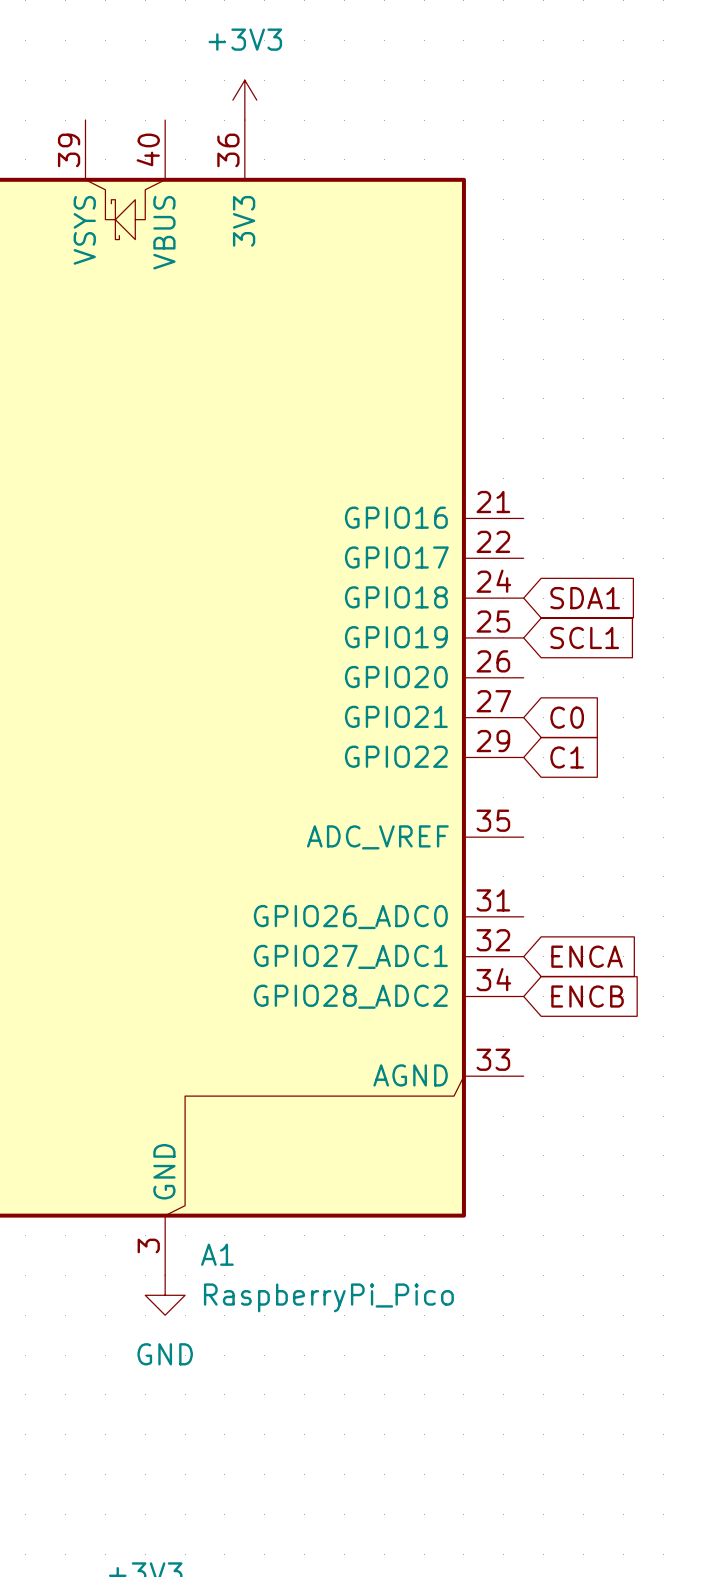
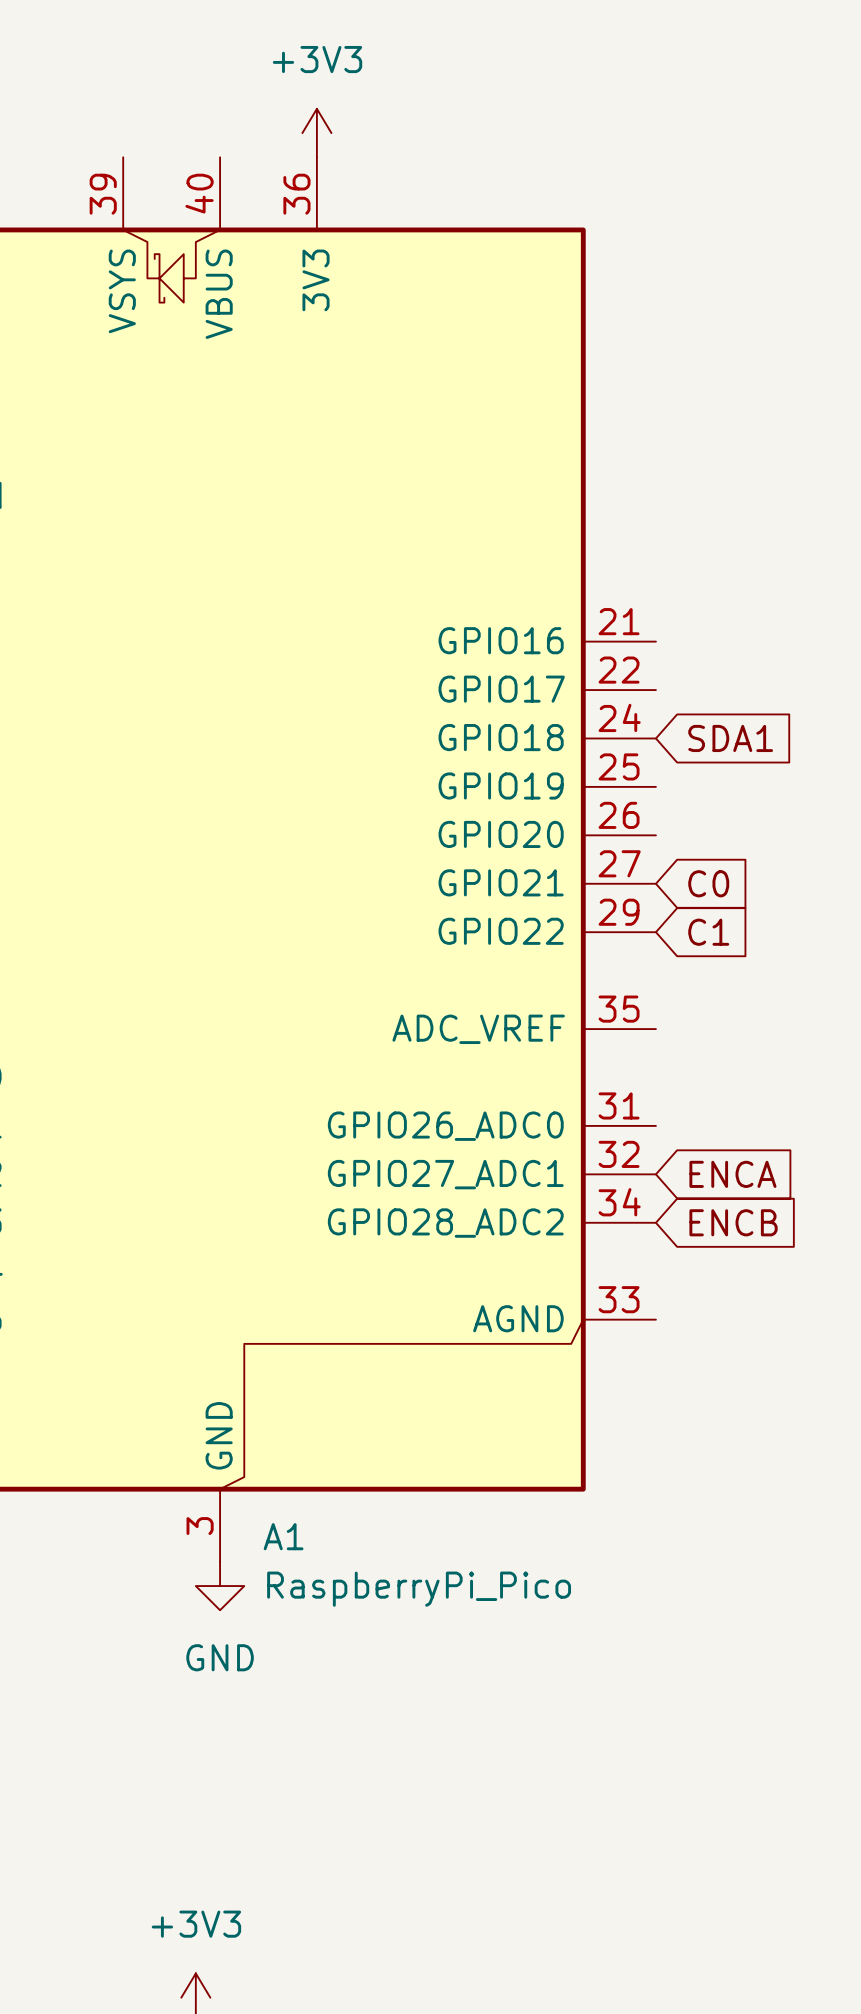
global label: SCL1 (584, 637) -> none

